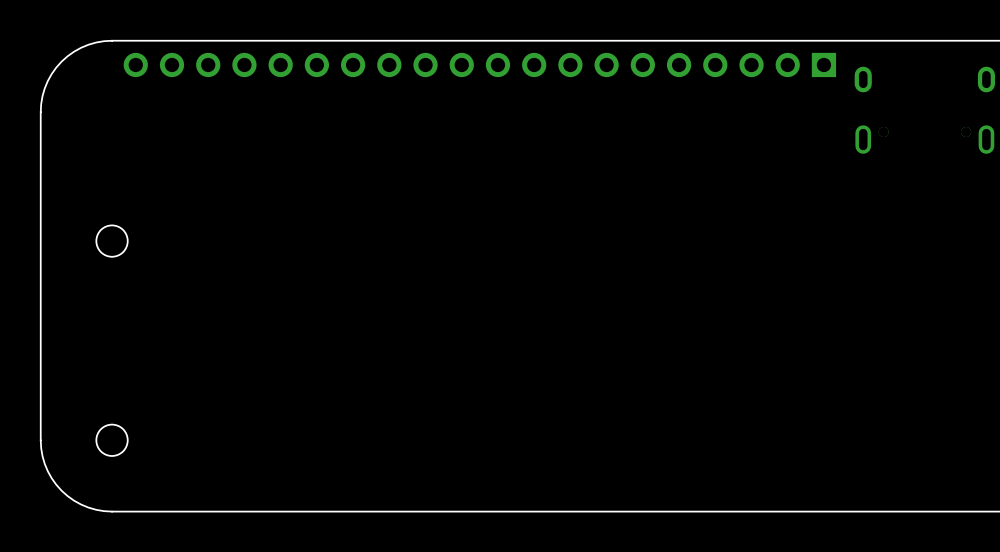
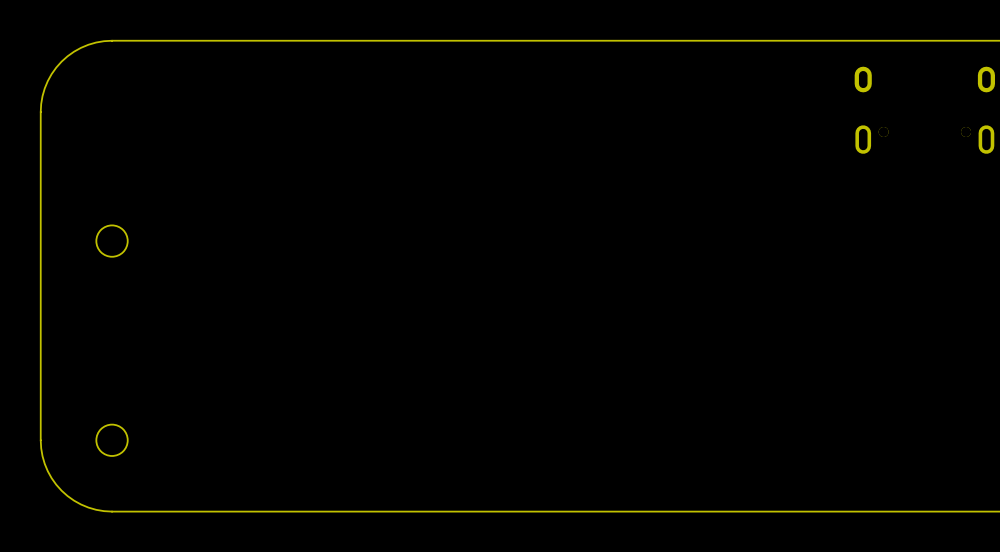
part: (479, 64) -> none

